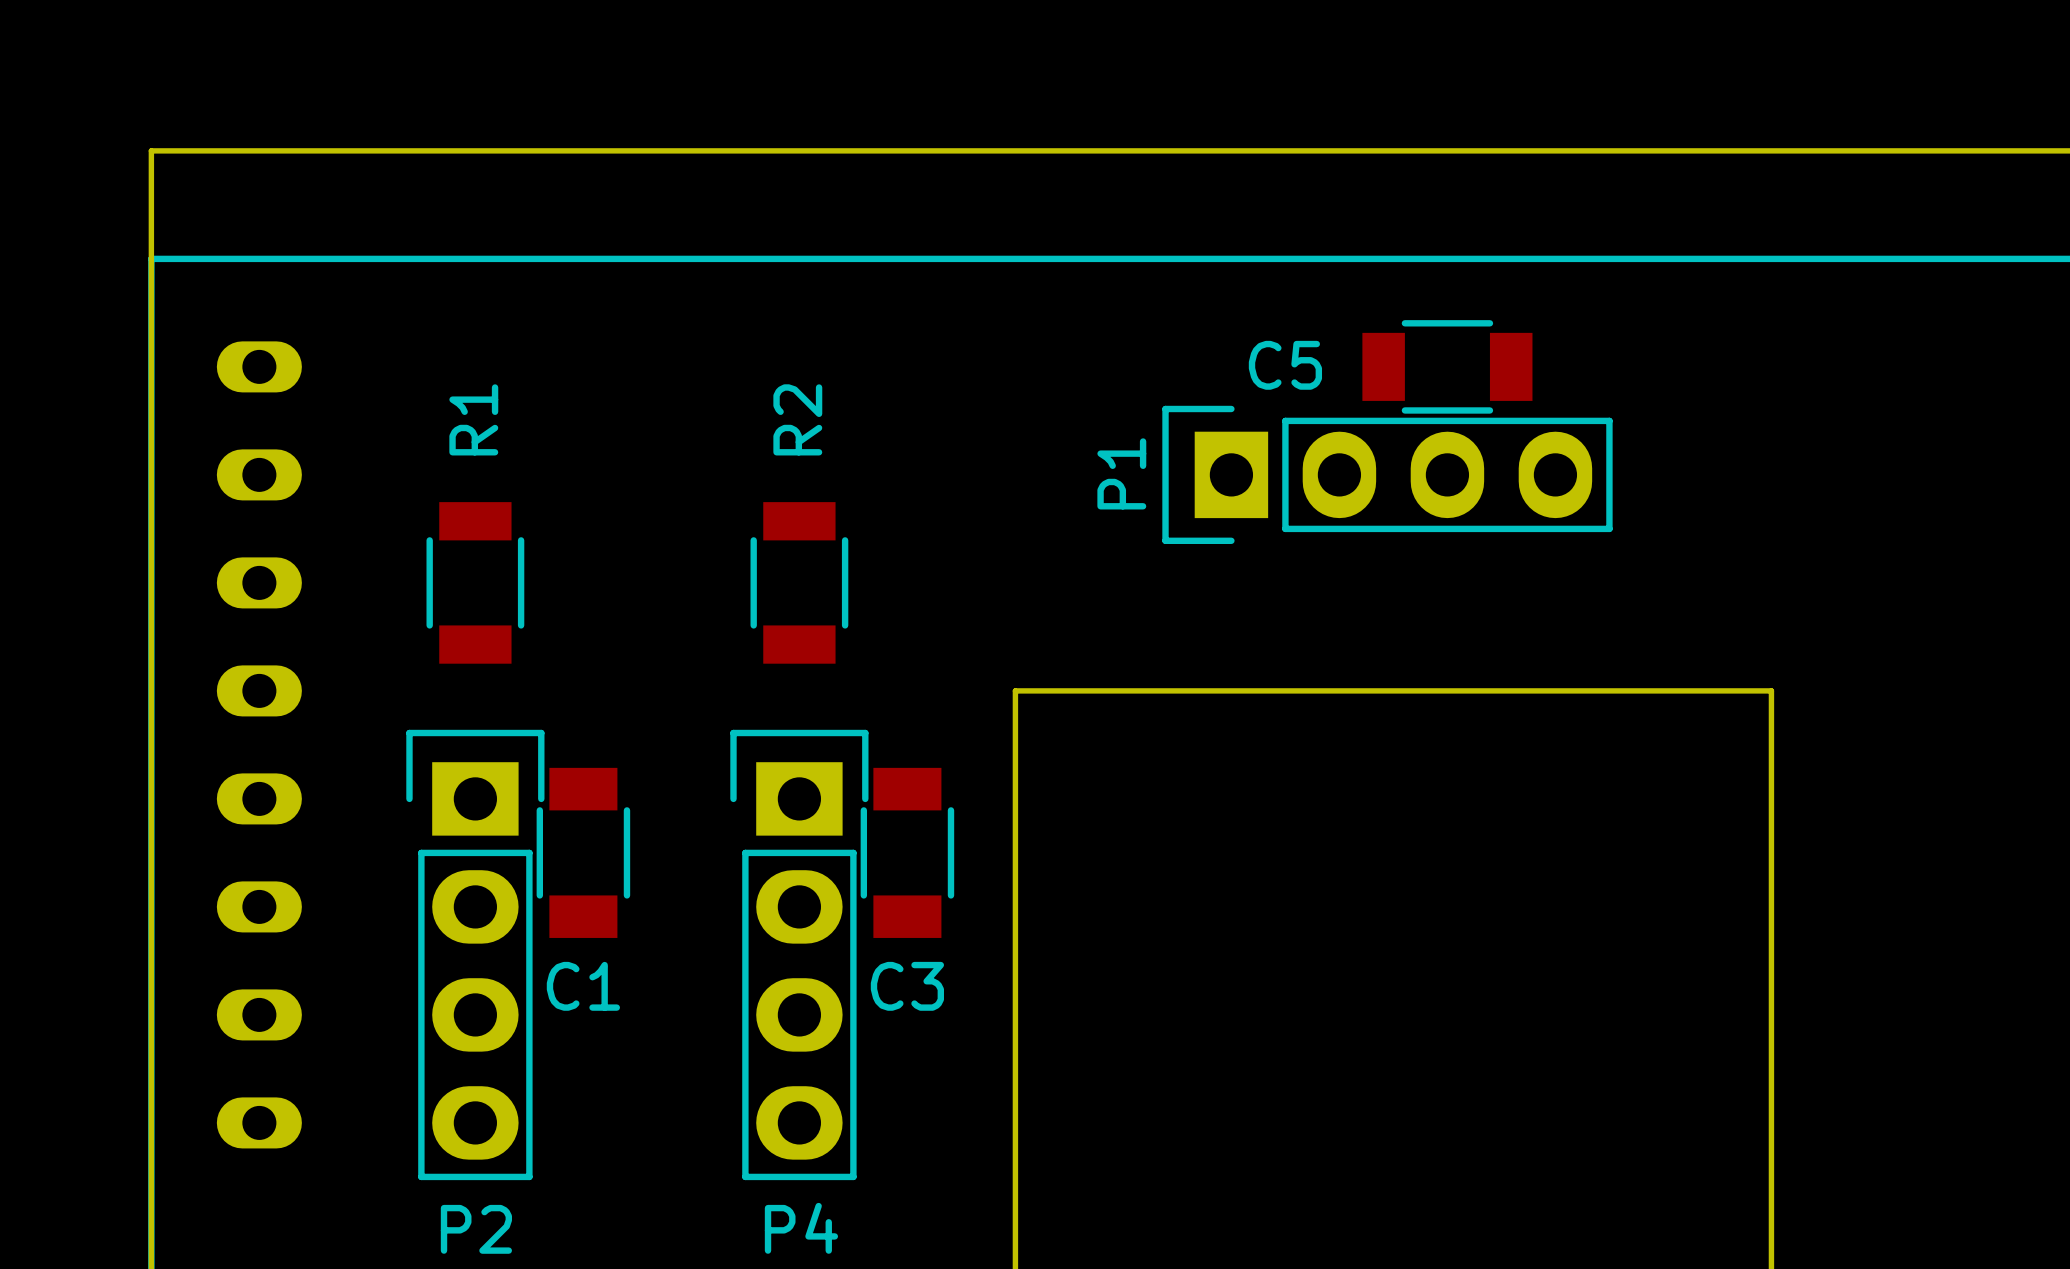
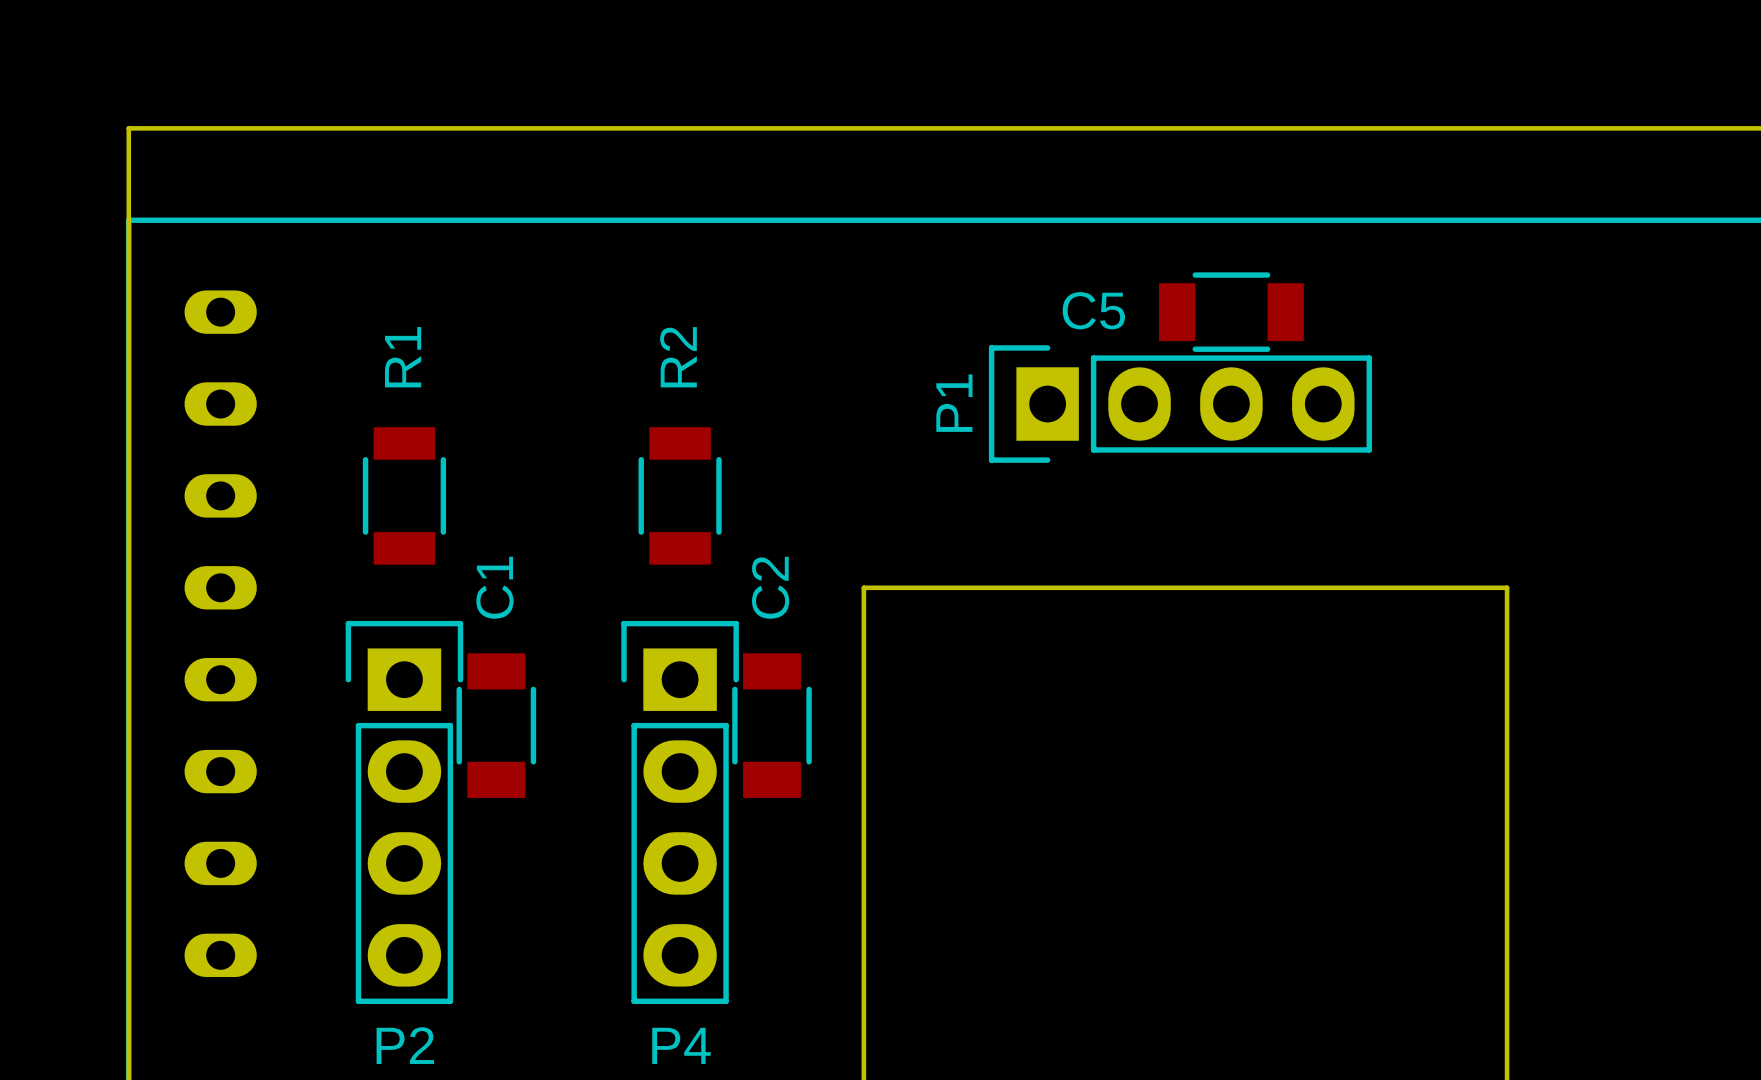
C1 name rotation: 0° (583, 986) -> 90° counterclockwise (494, 587)
C1 name position: C1 (583, 986) -> C1 (494, 587)
C3 name: C3 (907, 986) -> C2 (770, 587)

